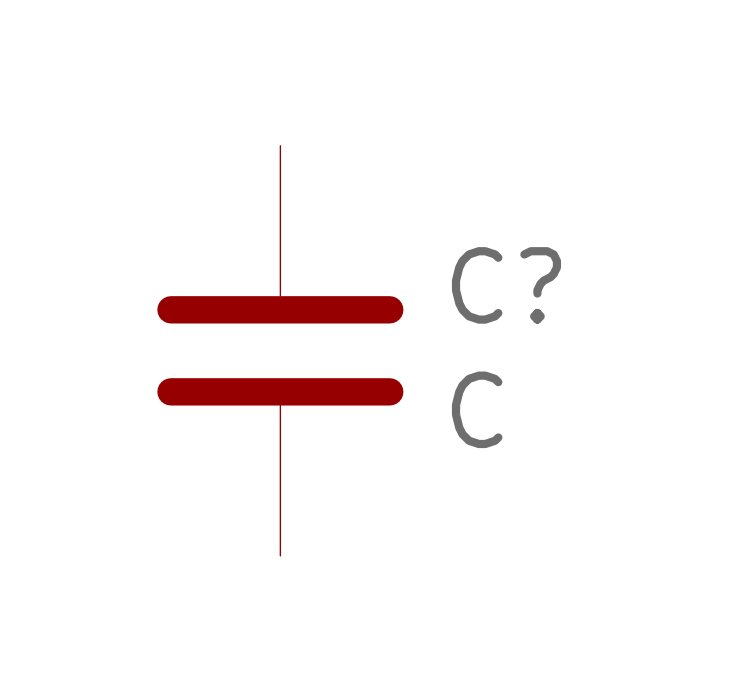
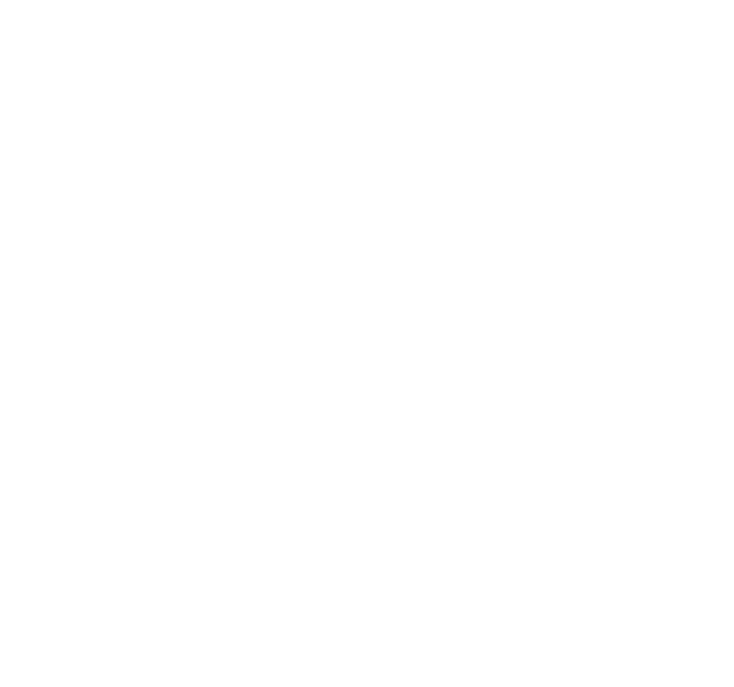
C?: C (280, 350) -> none

